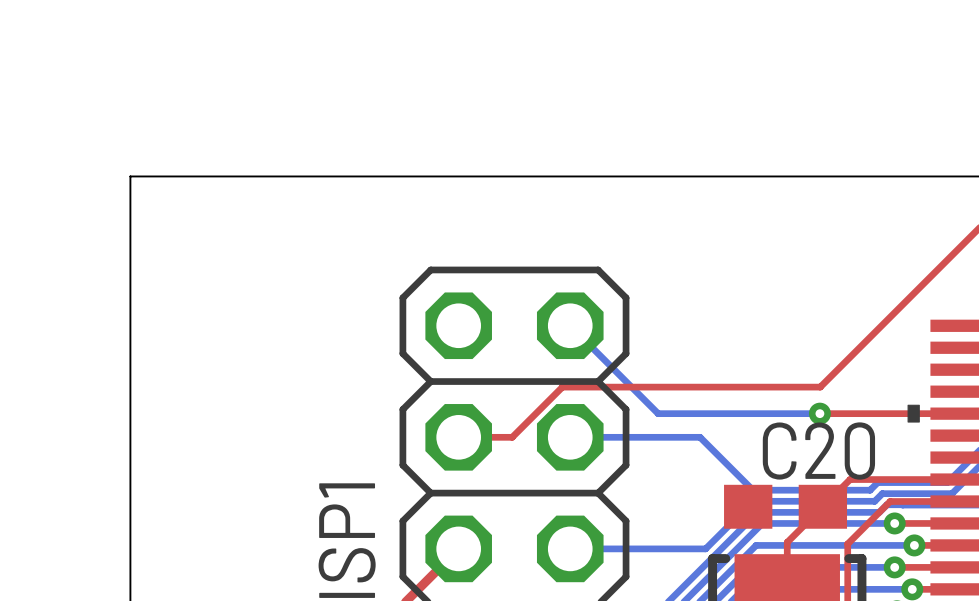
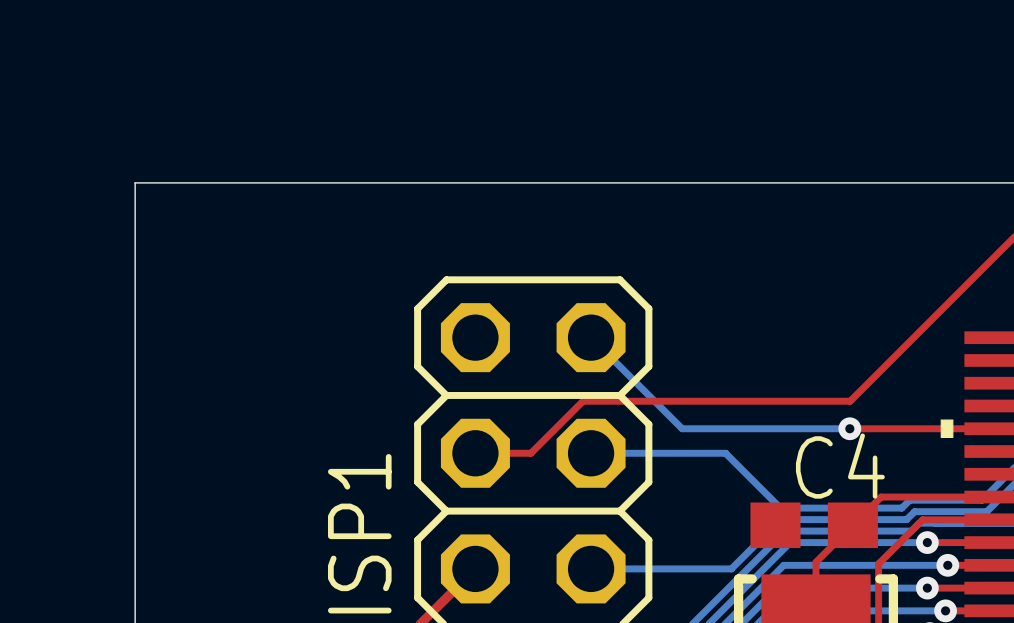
C20 name: C20 (818, 451) -> C4 (840, 466)

